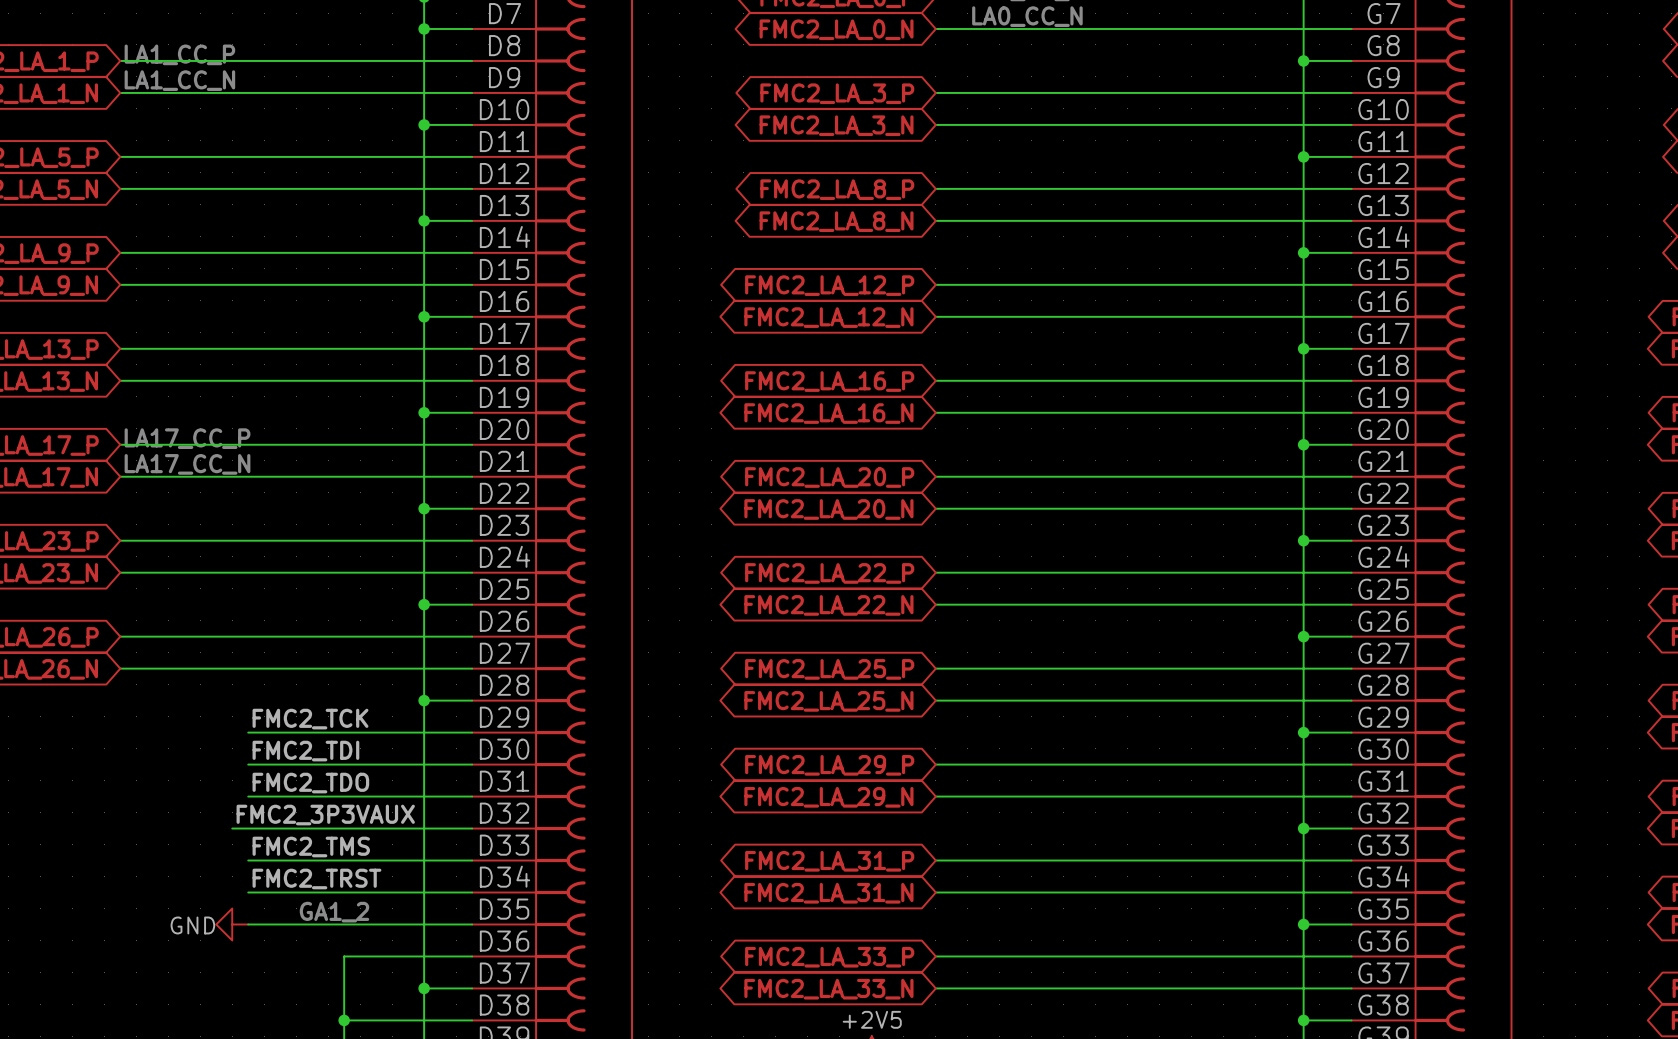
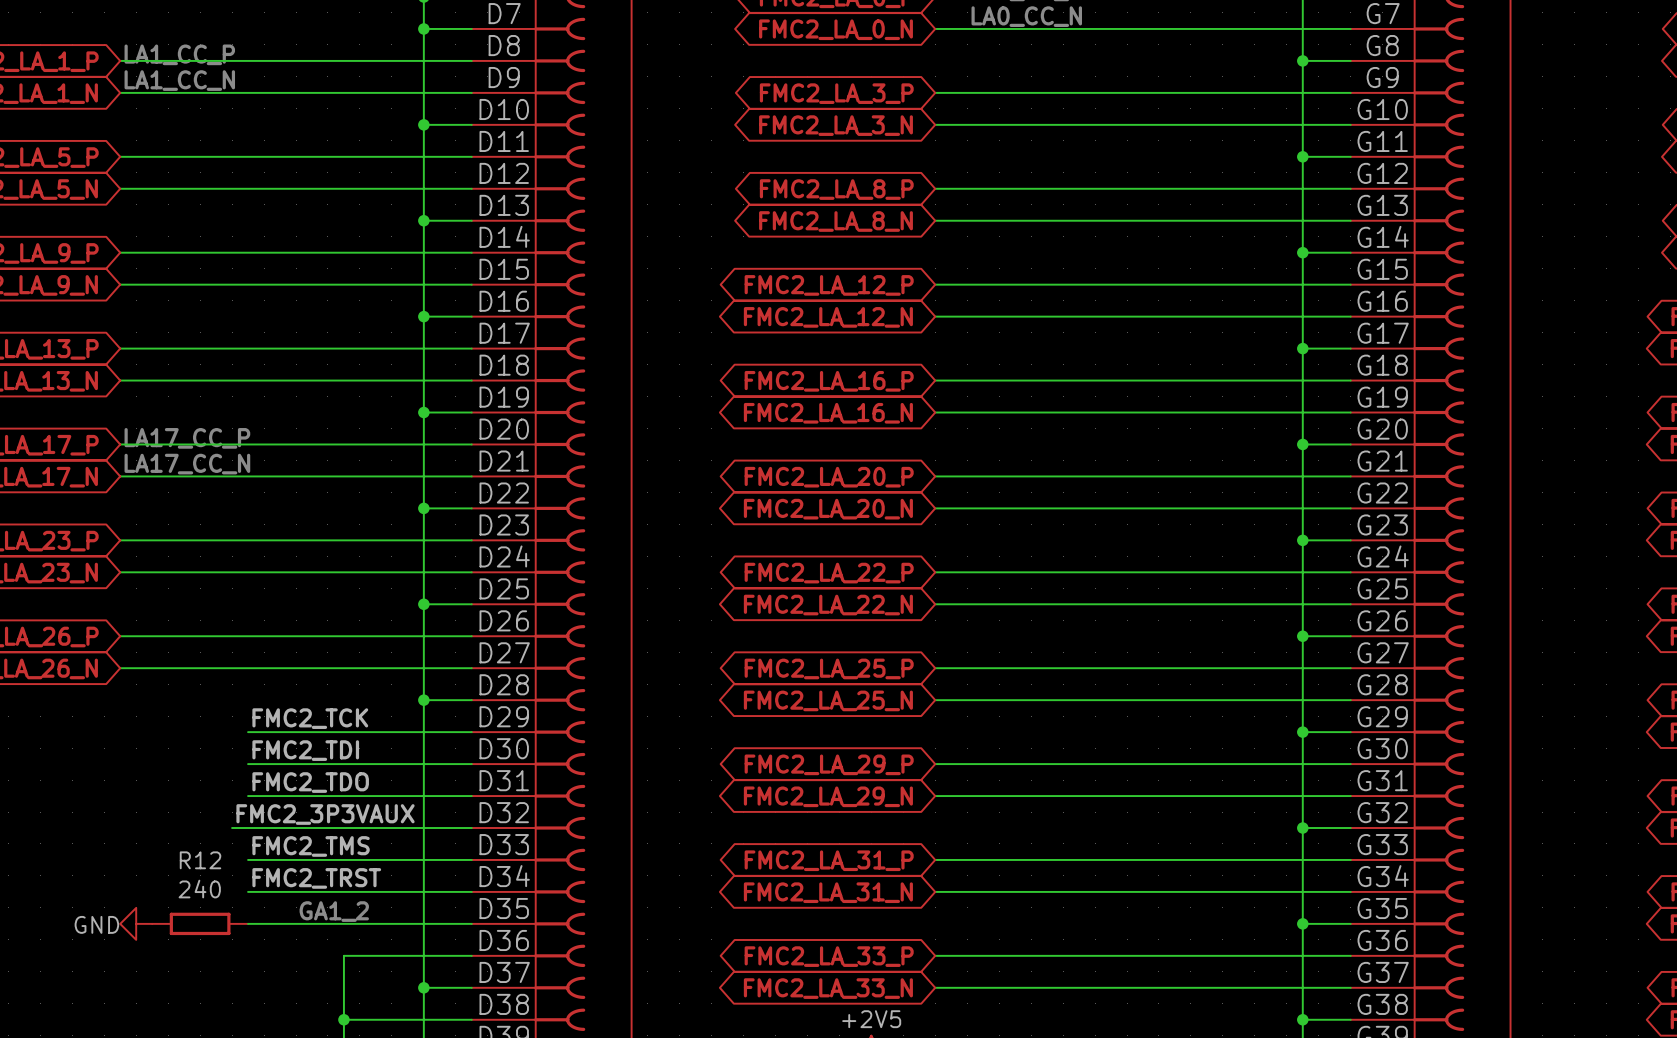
R12: none -> (200, 923)
power symbol position: GND (232, 924) -> GND (136, 923)

